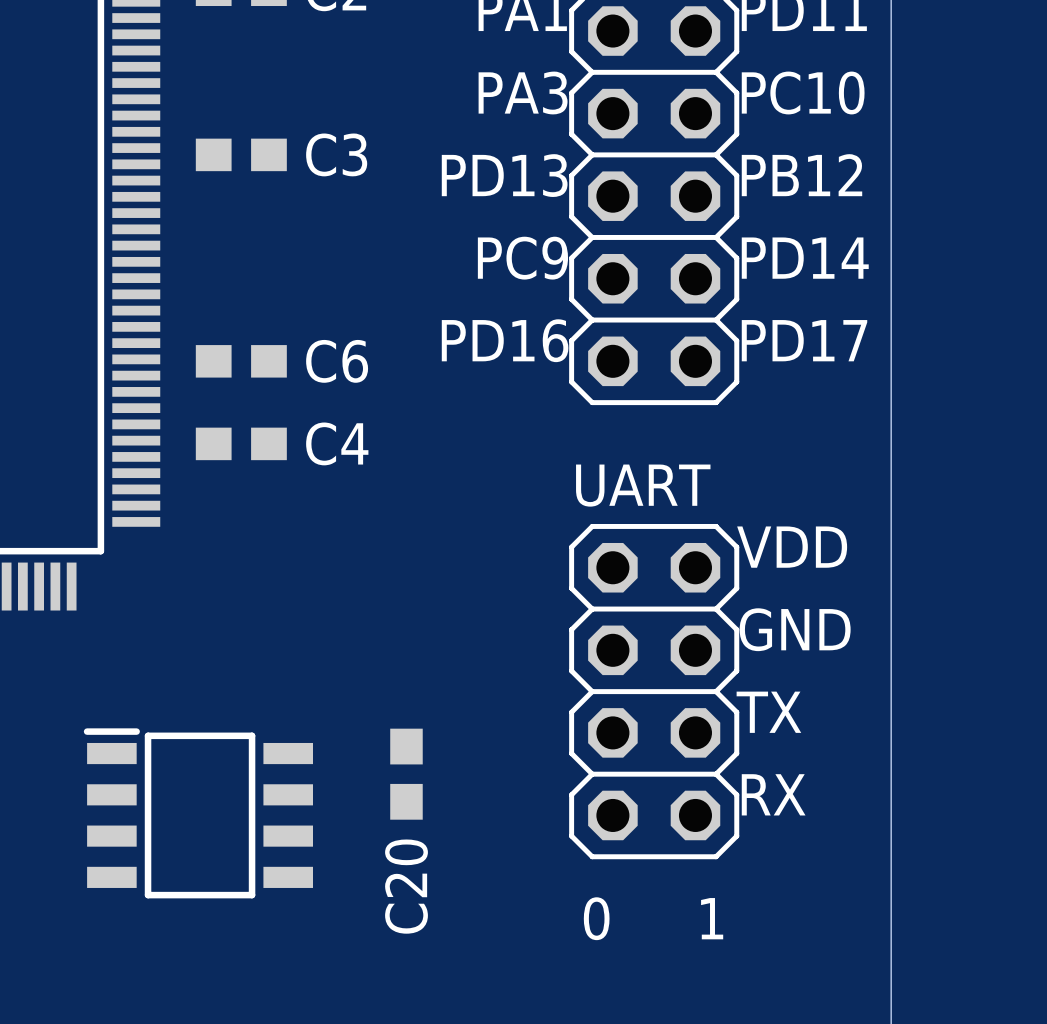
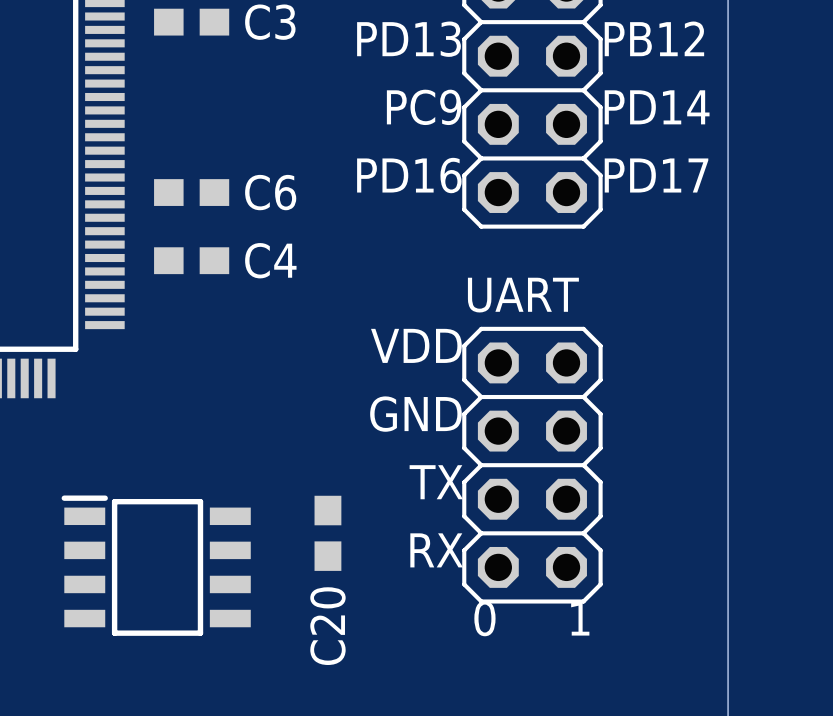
text position: VDD (792, 547) -> VDD (416, 345)
text position: GND (795, 629) -> GND (415, 414)
text position: TX (768, 712) -> TX (436, 482)
text position: RX (773, 794) -> RX (436, 550)
text position: 0 (596, 918) -> 0 (484, 618)
text position: 1 (712, 918) -> 1 (580, 618)

